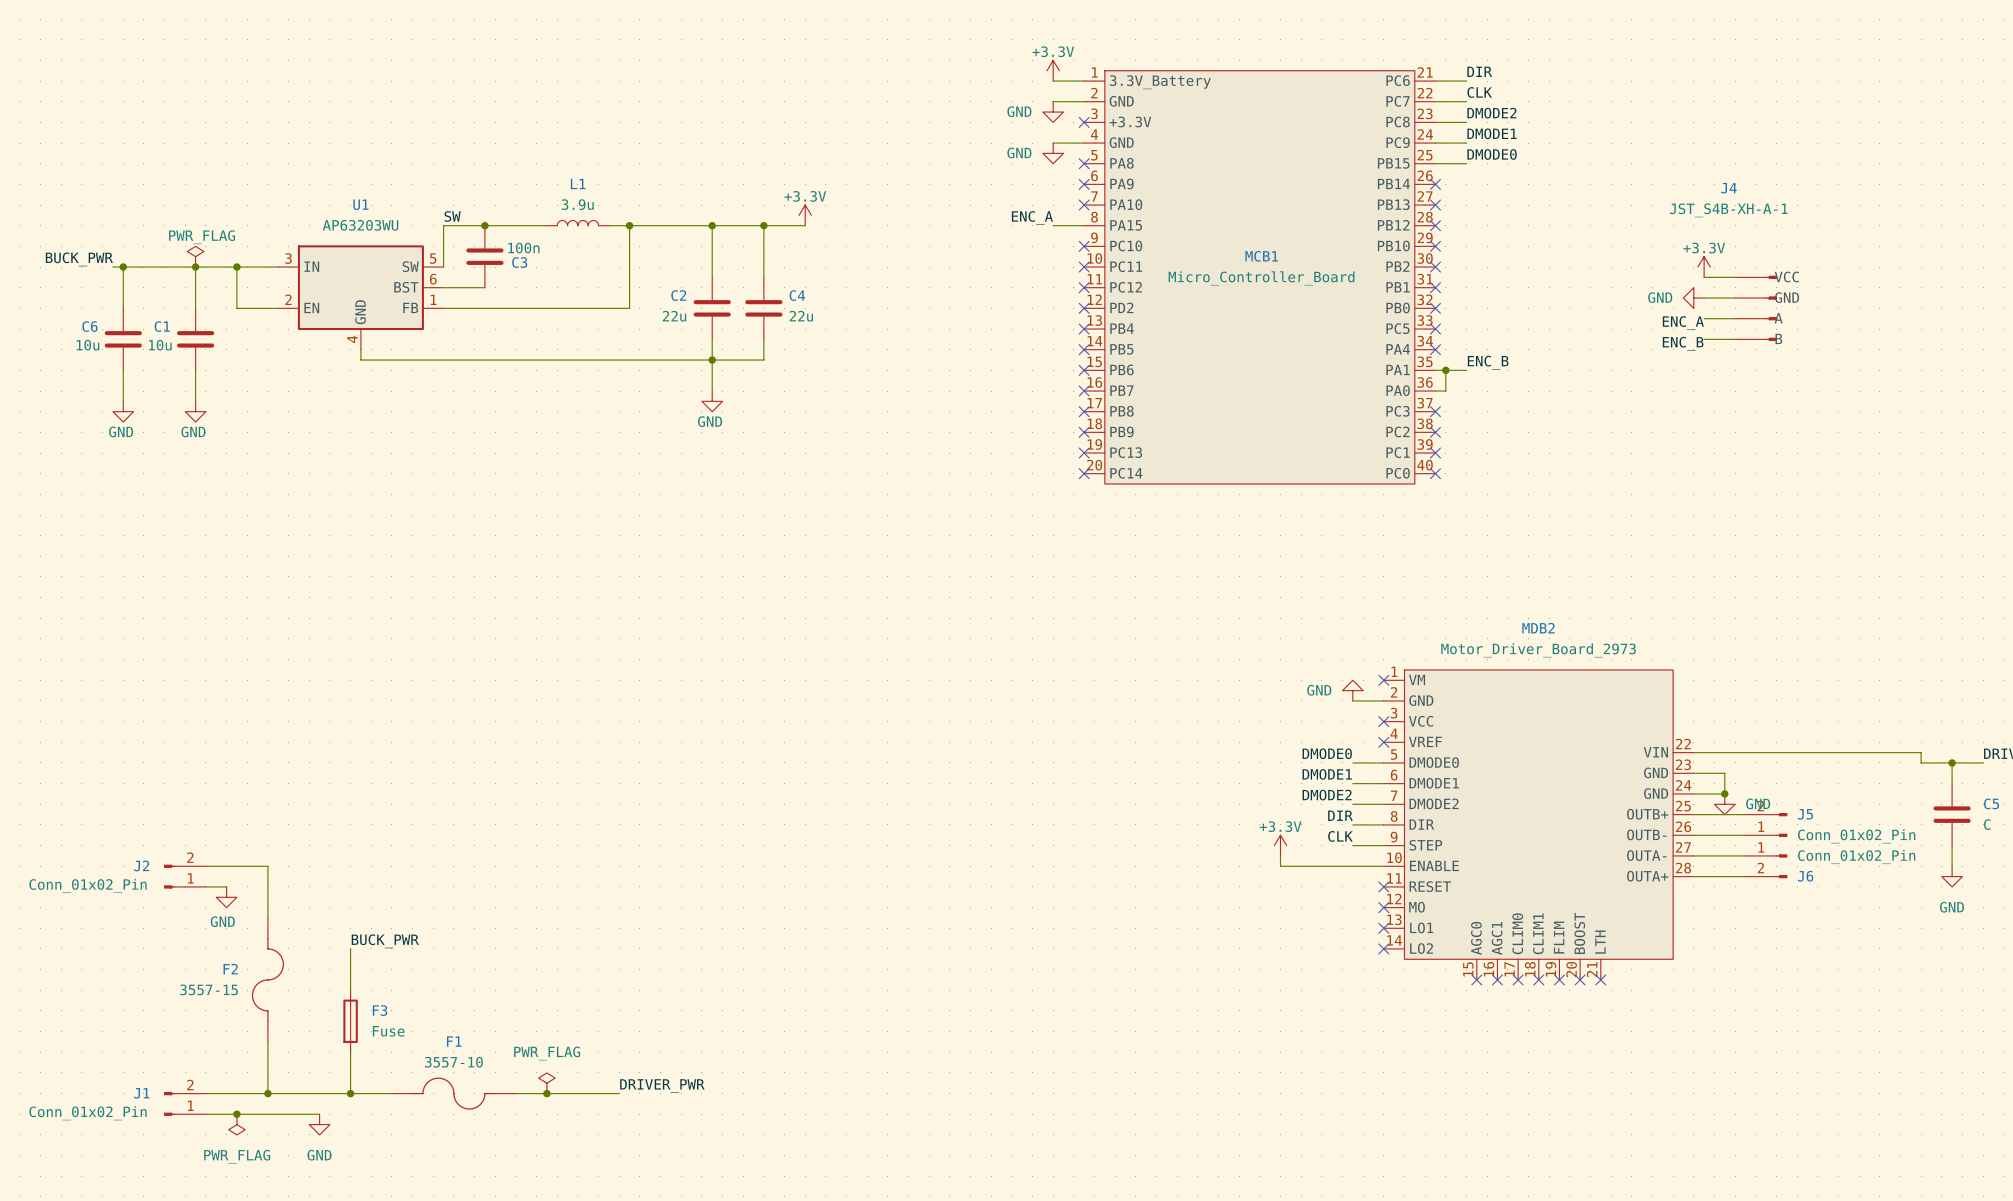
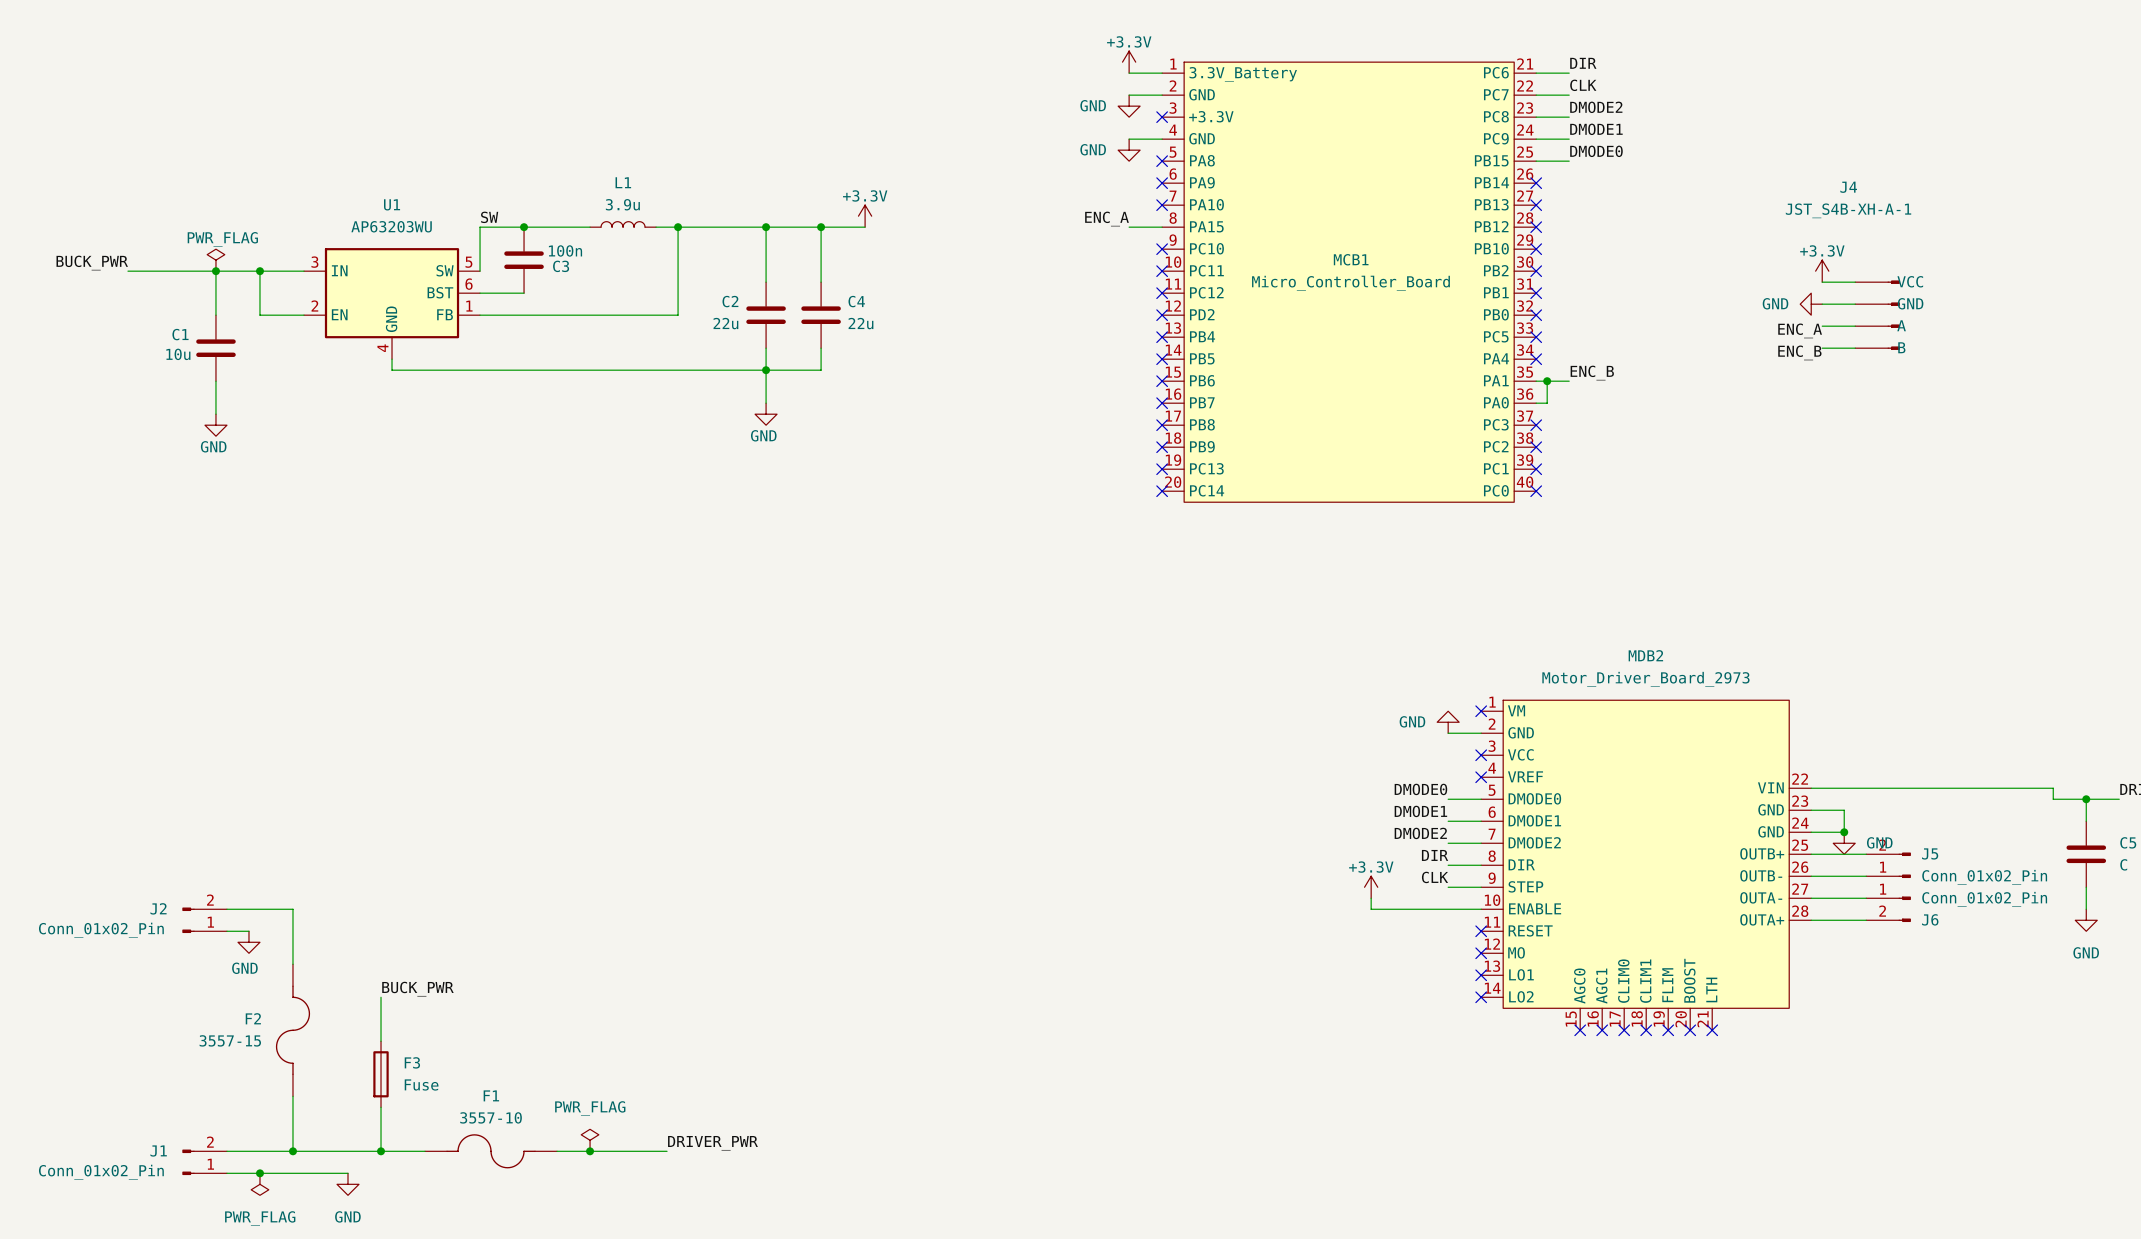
wire: (123, 267) (123, 308) -> none
junction: (123, 267) -> none
C6: 10u (123, 339) -> none
wire: (123, 370) (123, 401) -> none
power symbol: GND (123, 411) -> none

